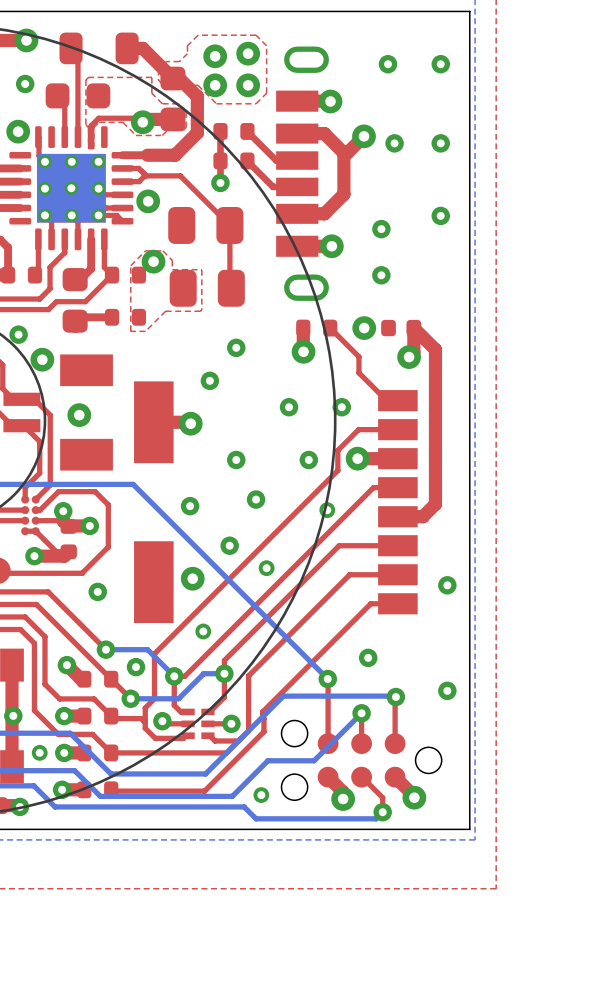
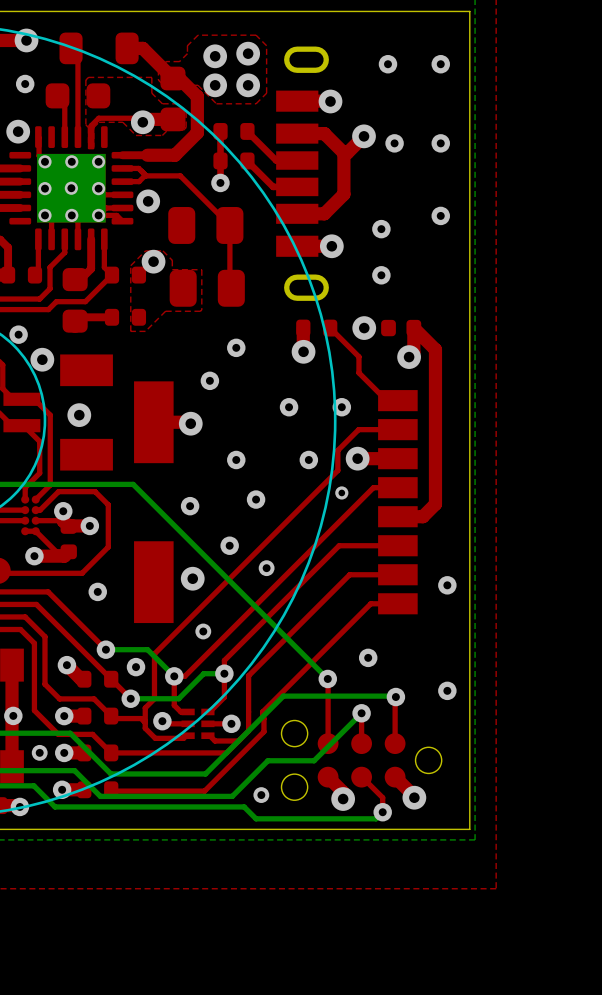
via: none -> (341, 492)
via: (327, 510) -> none

